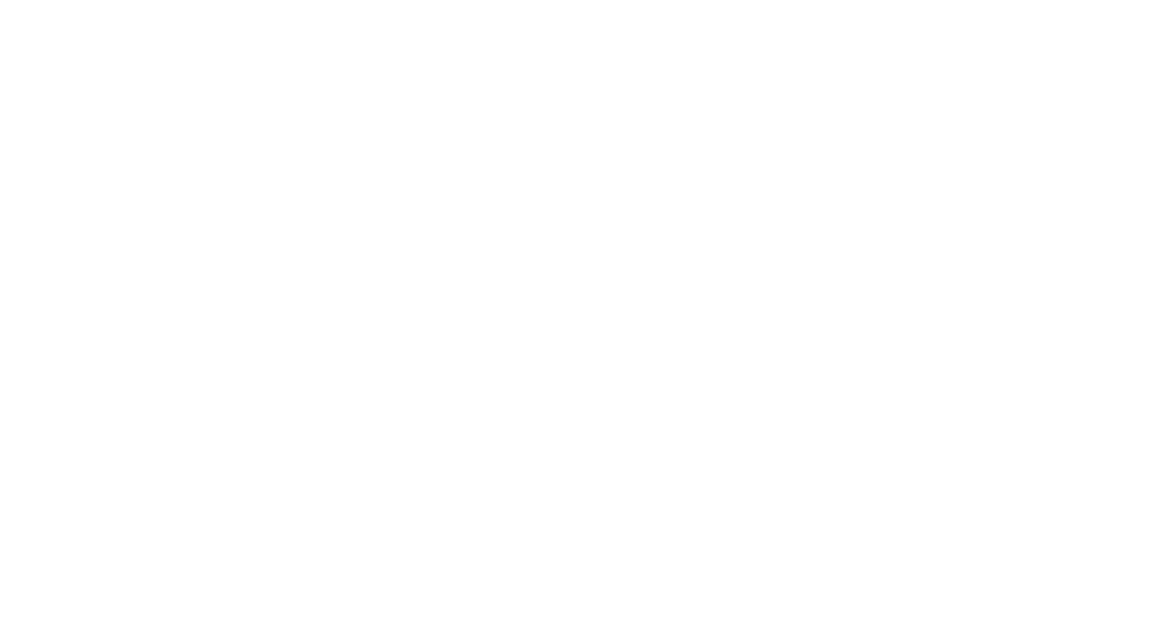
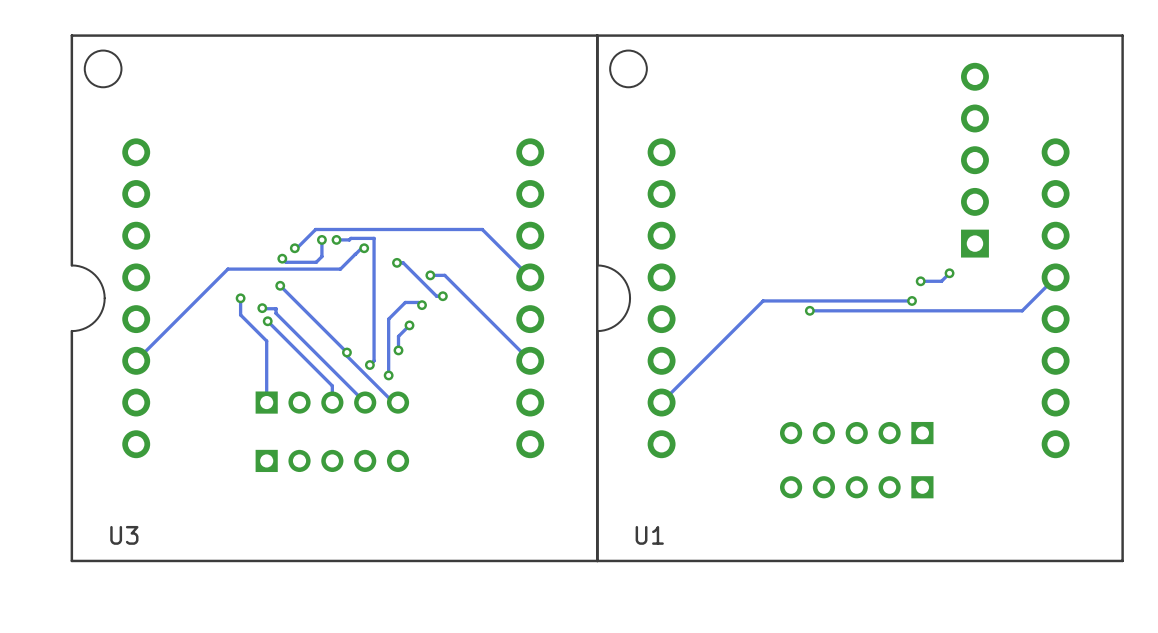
part: none -> (974, 160)
track: none -> (321, 239) (321, 256) (316, 262) (285, 262) (282, 258)
via: none -> (321, 239)
track: none -> (336, 239) (374, 238) (374, 360) (369, 365)
via: none -> (336, 239)
track: none -> (294, 248) (315, 229) (482, 229) (530, 277)
via: none -> (294, 248)
track: none -> (364, 248) (361, 248) (355, 254)
via: none -> (364, 248)
track: none -> (355, 254) (340, 269) (227, 269) (136, 360)
via: none -> (282, 258)
track: none -> (396, 262) (403, 262) (436, 296) (442, 296)
via: none -> (396, 262)
track: none -> (949, 273) (941, 281) (920, 281)
via: none -> (949, 273)
track: none -> (430, 275) (444, 275) (530, 360)
via: none -> (430, 275)
track: none -> (1055, 277) (1022, 310) (809, 310)
via: none -> (920, 281)
track: none -> (280, 285) (393, 402) (398, 402)
via: none -> (280, 285)
via: none -> (442, 296)
track: none -> (240, 298) (240, 314) (266, 341) (266, 402)
via: none -> (240, 298)
U3: none -> (334, 298)
U1: none -> (859, 298)
track: none -> (911, 300) (763, 300) (661, 402)
via: none -> (912, 300)
track: none -> (422, 305) (418, 302) (405, 302) (388, 319) (388, 375)
via: none -> (422, 305)
track: none -> (262, 308) (276, 308) (276, 313) (365, 402)
via: none -> (262, 308)
via: none -> (809, 310)
track: none -> (267, 321) (332, 385) (332, 402)
via: none -> (267, 321)
track: none -> (409, 325) (398, 336) (398, 350)
via: none -> (409, 325)
via: none -> (398, 350)
via: none -> (346, 352)
via: none -> (369, 365)
via: none -> (388, 375)
part: none -> (332, 402)
part: none -> (856, 433)
part: none -> (332, 460)
part: none -> (856, 487)

